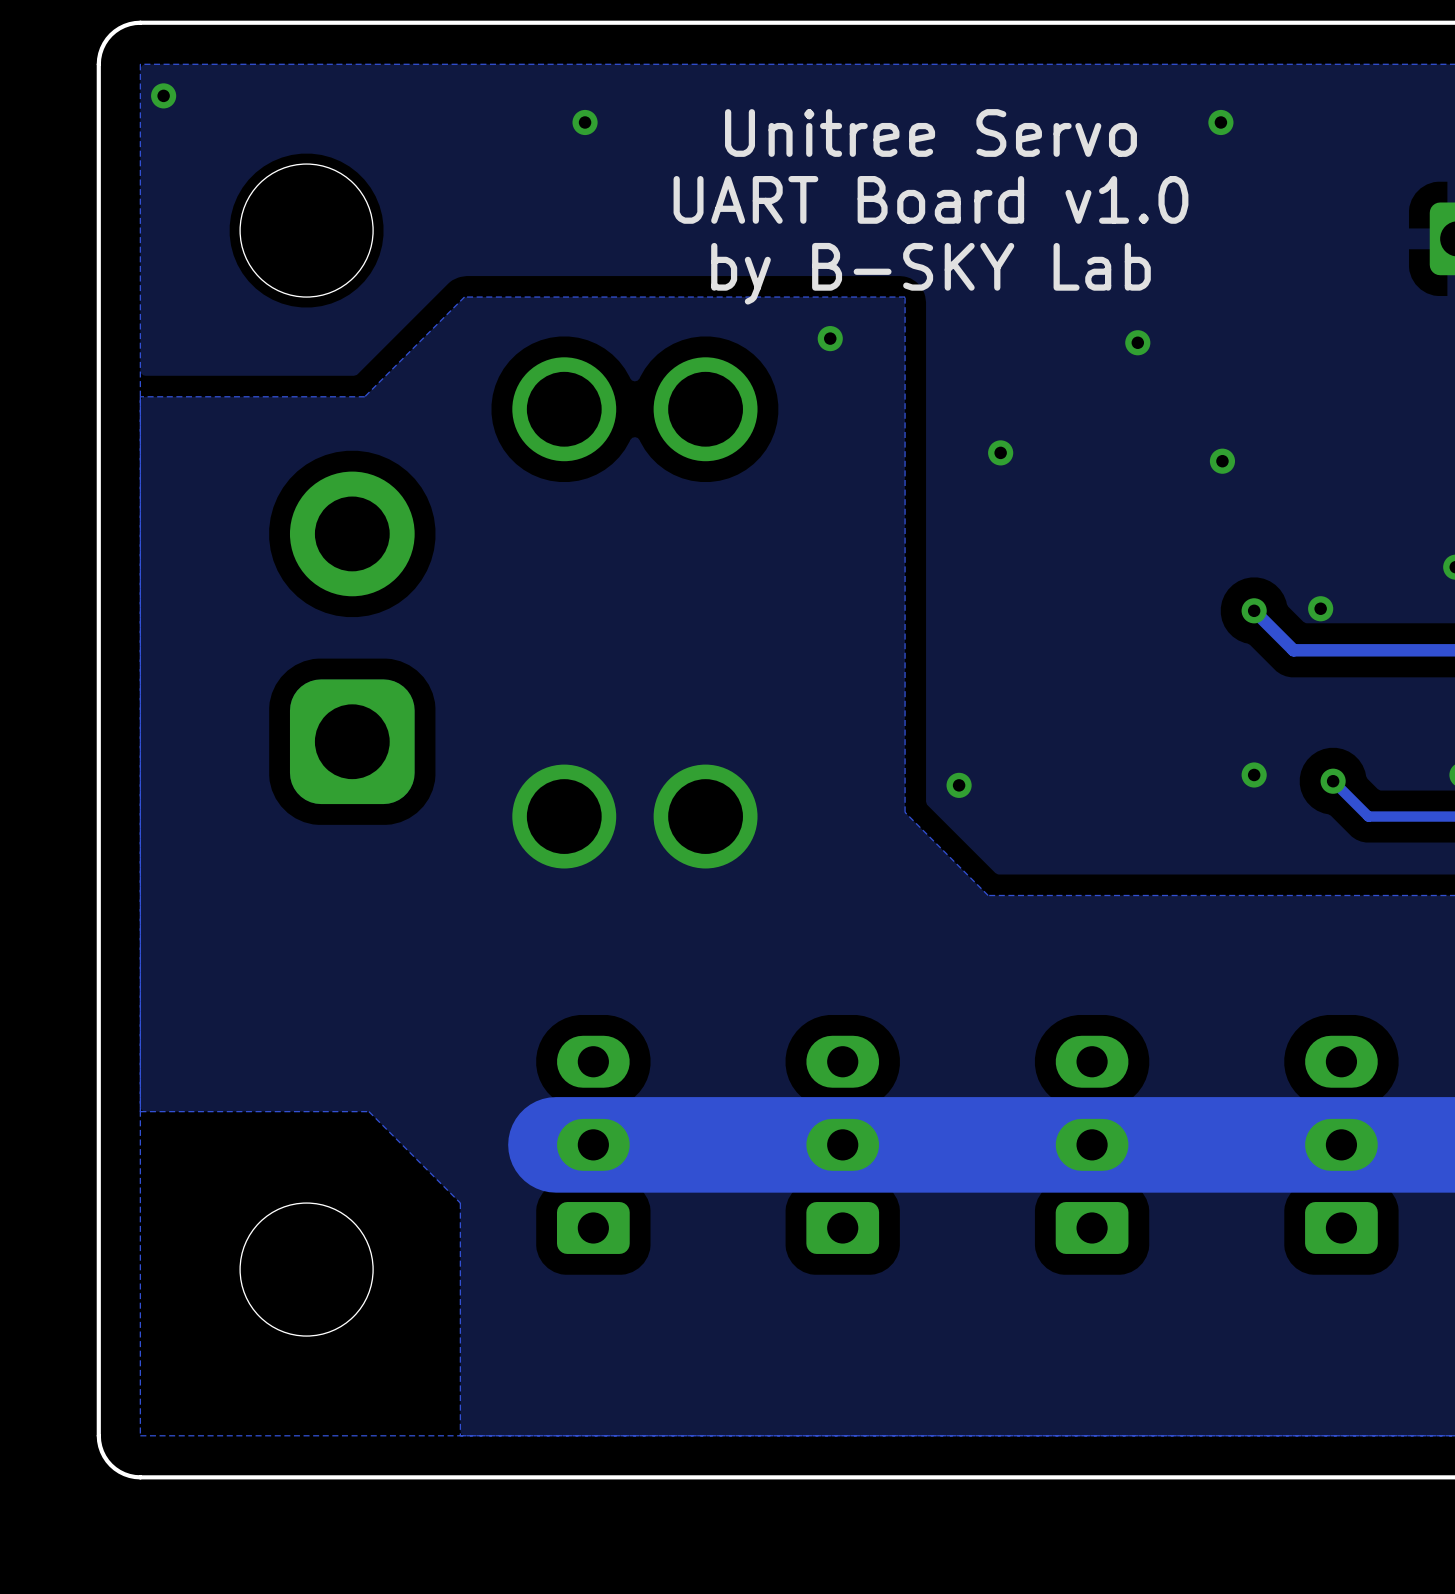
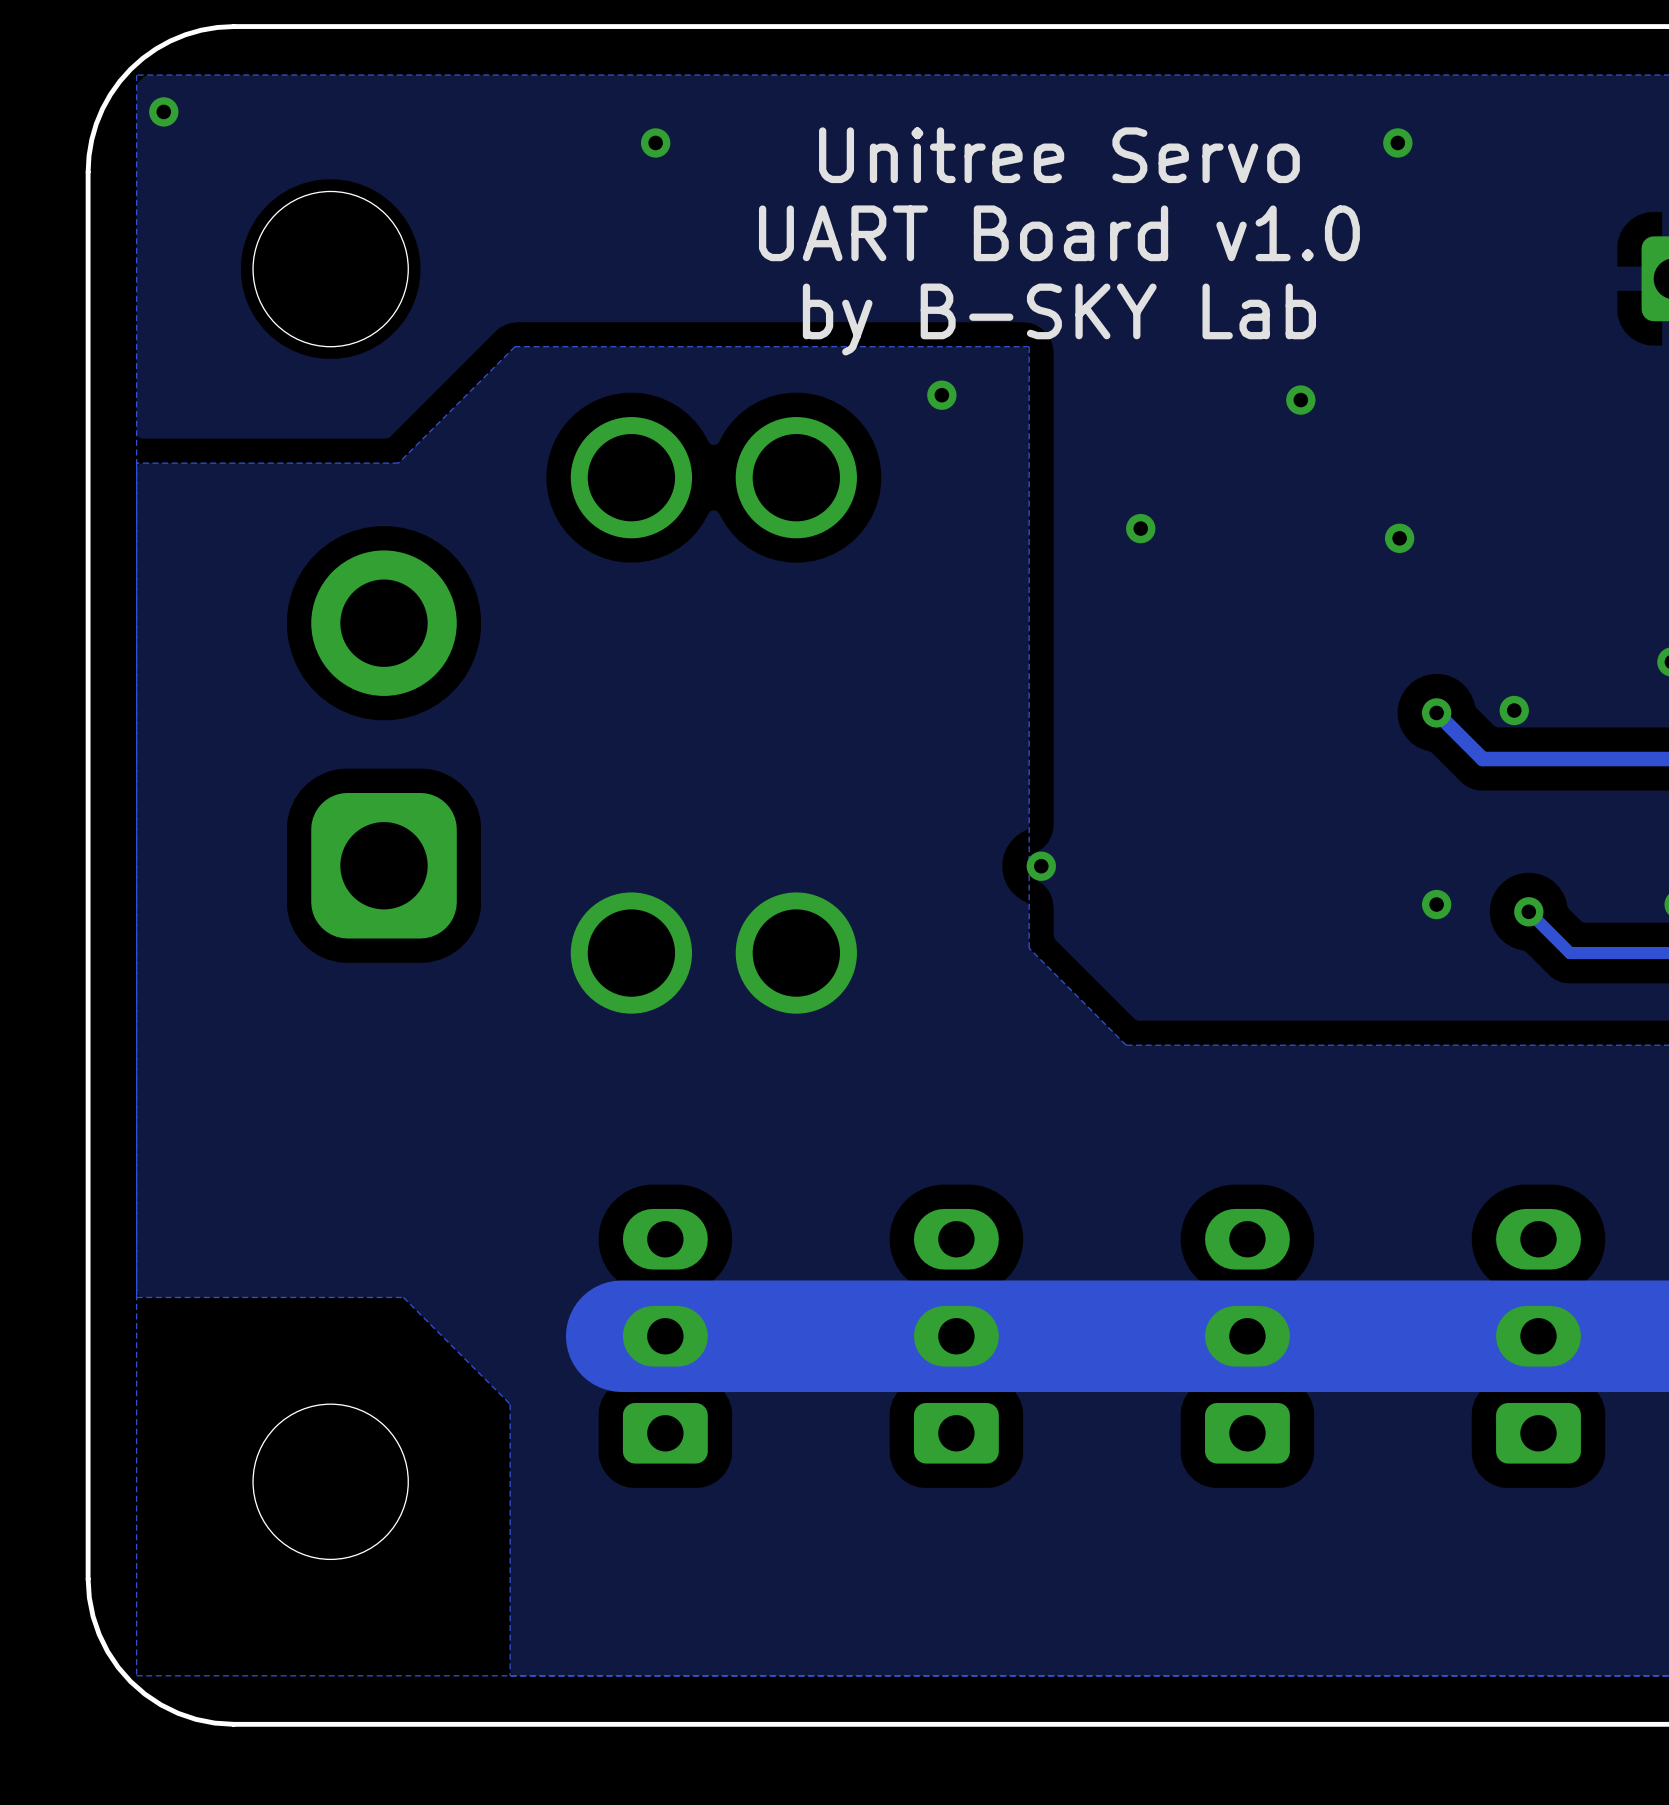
board edge: (223, 22) (134, 23) (119, 28) (110, 34) (101, 48) (99, 58) (98, 147) -> (233, 26) (201, 30) (185, 34) (156, 48) (130, 69) (110, 94) (102, 108) (91, 139) (88, 172)
via position: (959, 785) -> (1041, 866)
board edge: (98, 1352) (99, 1441) (101, 1451) (110, 1465) (124, 1474) (134, 1476) (223, 1477) -> (88, 1578) (89, 1597) (99, 1634) (107, 1651) (130, 1681) (160, 1704) (177, 1713) (195, 1719) (233, 1724)

